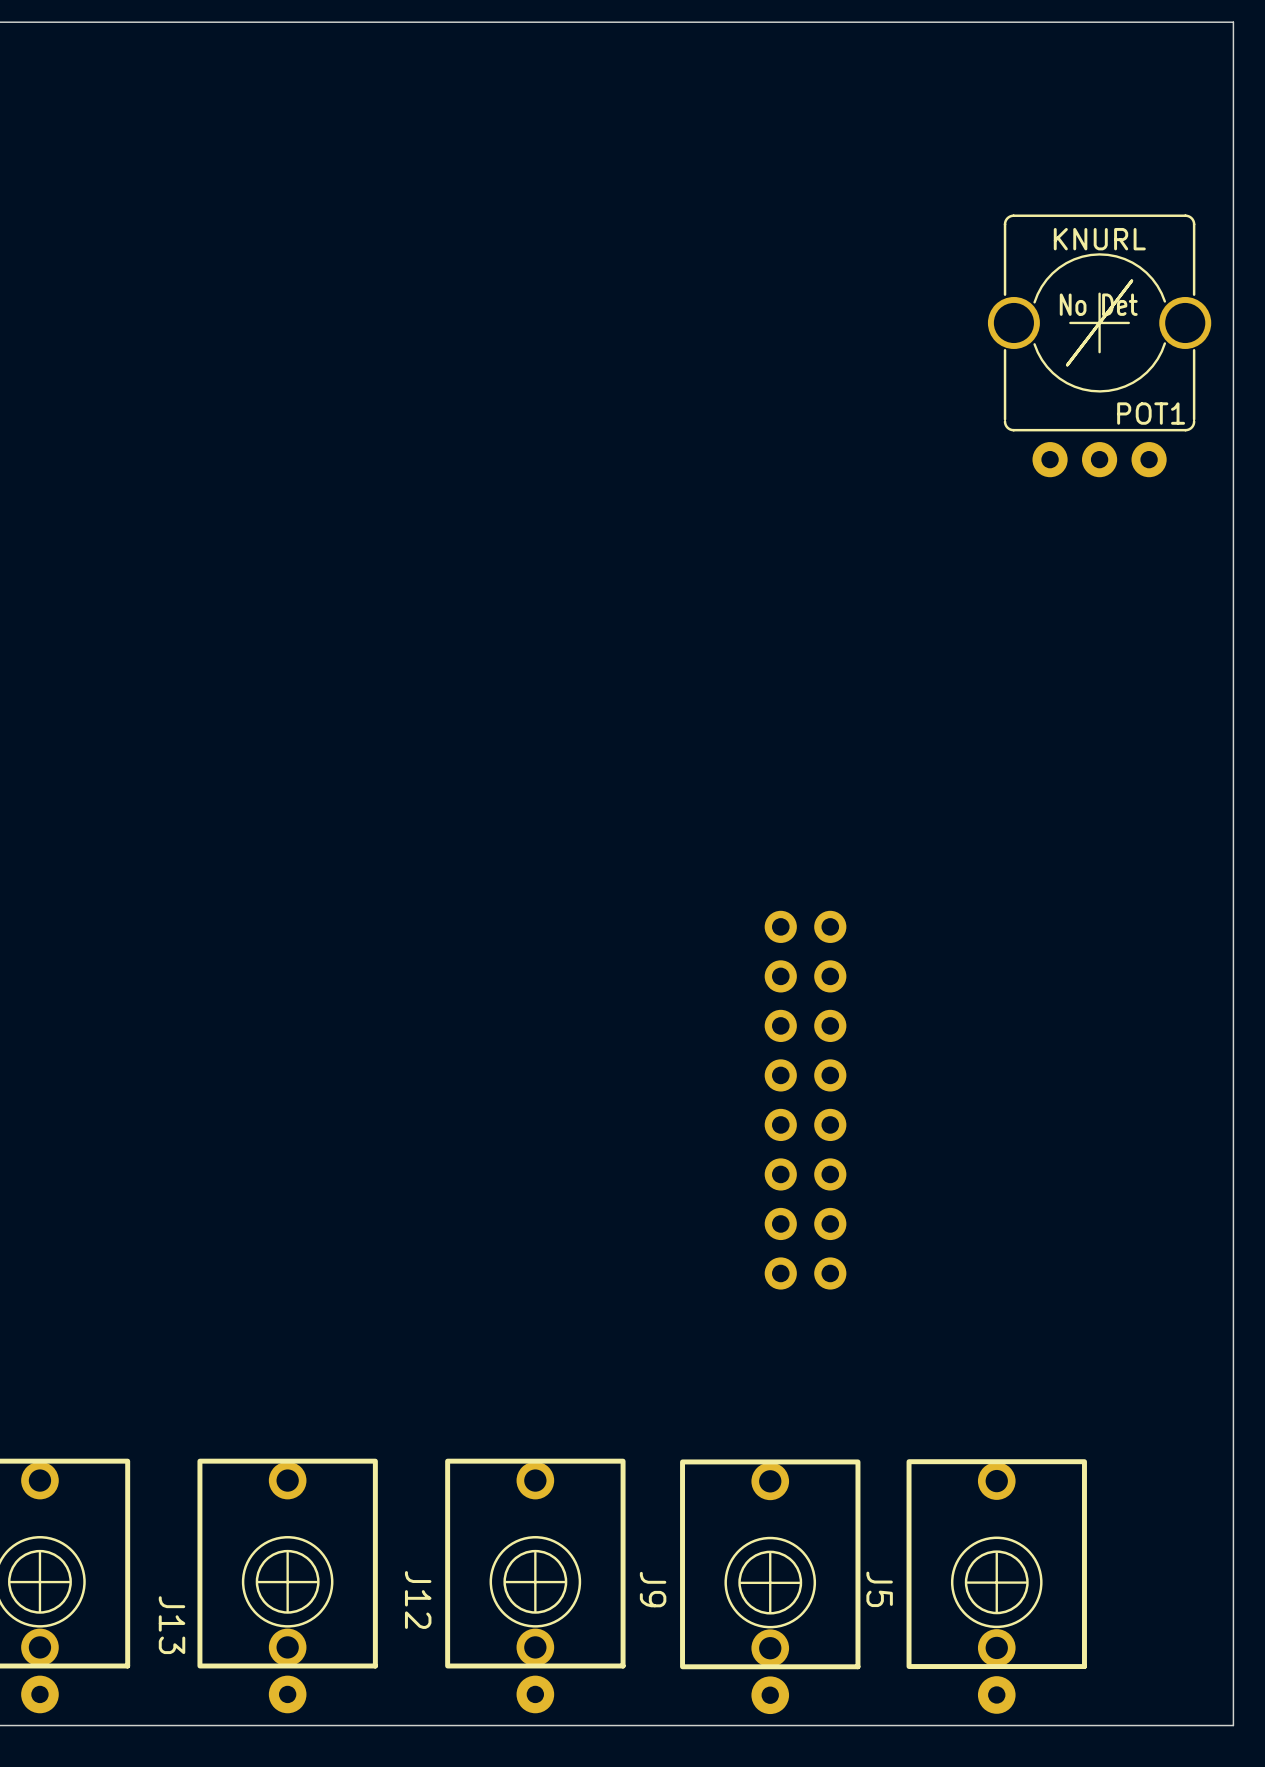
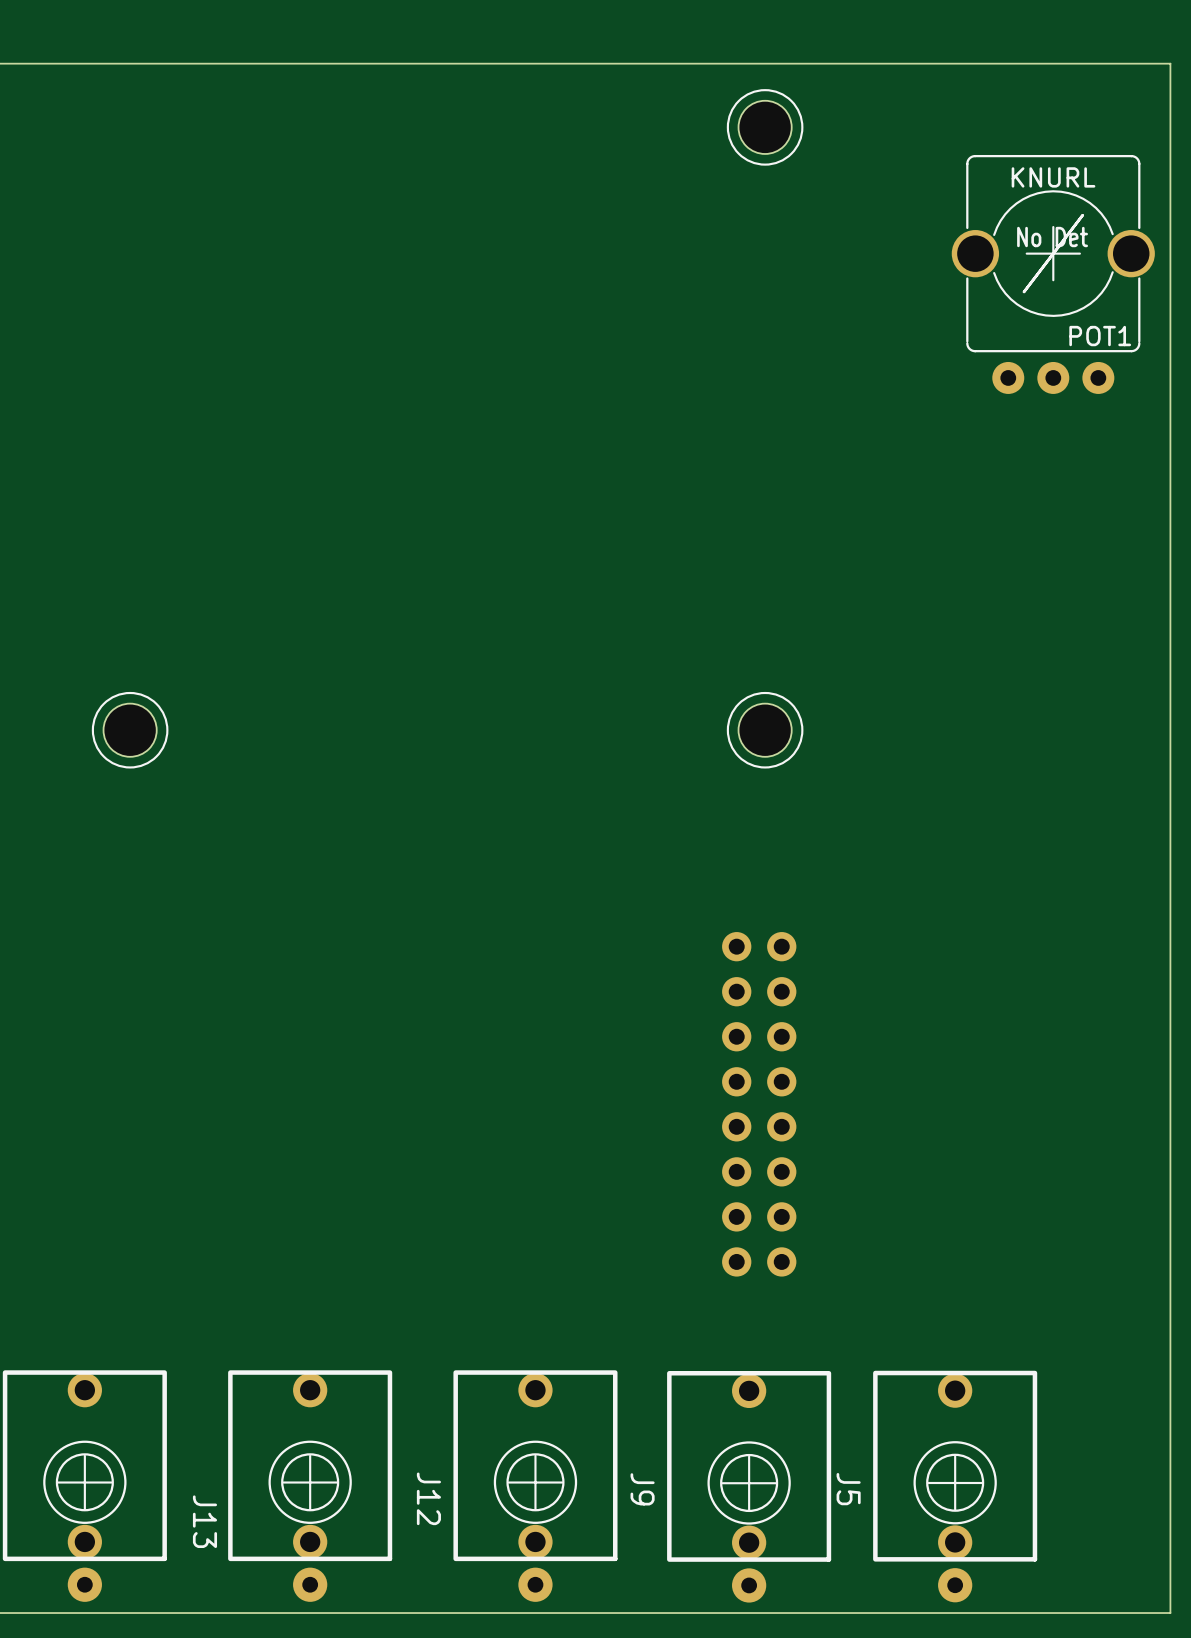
part: none -> (765, 127)
POT1 position: (1099, 345) -> (1053, 274)
part: none -> (130, 730)
part: none -> (765, 730)
part position: (805, 1100) -> (759, 1104)

